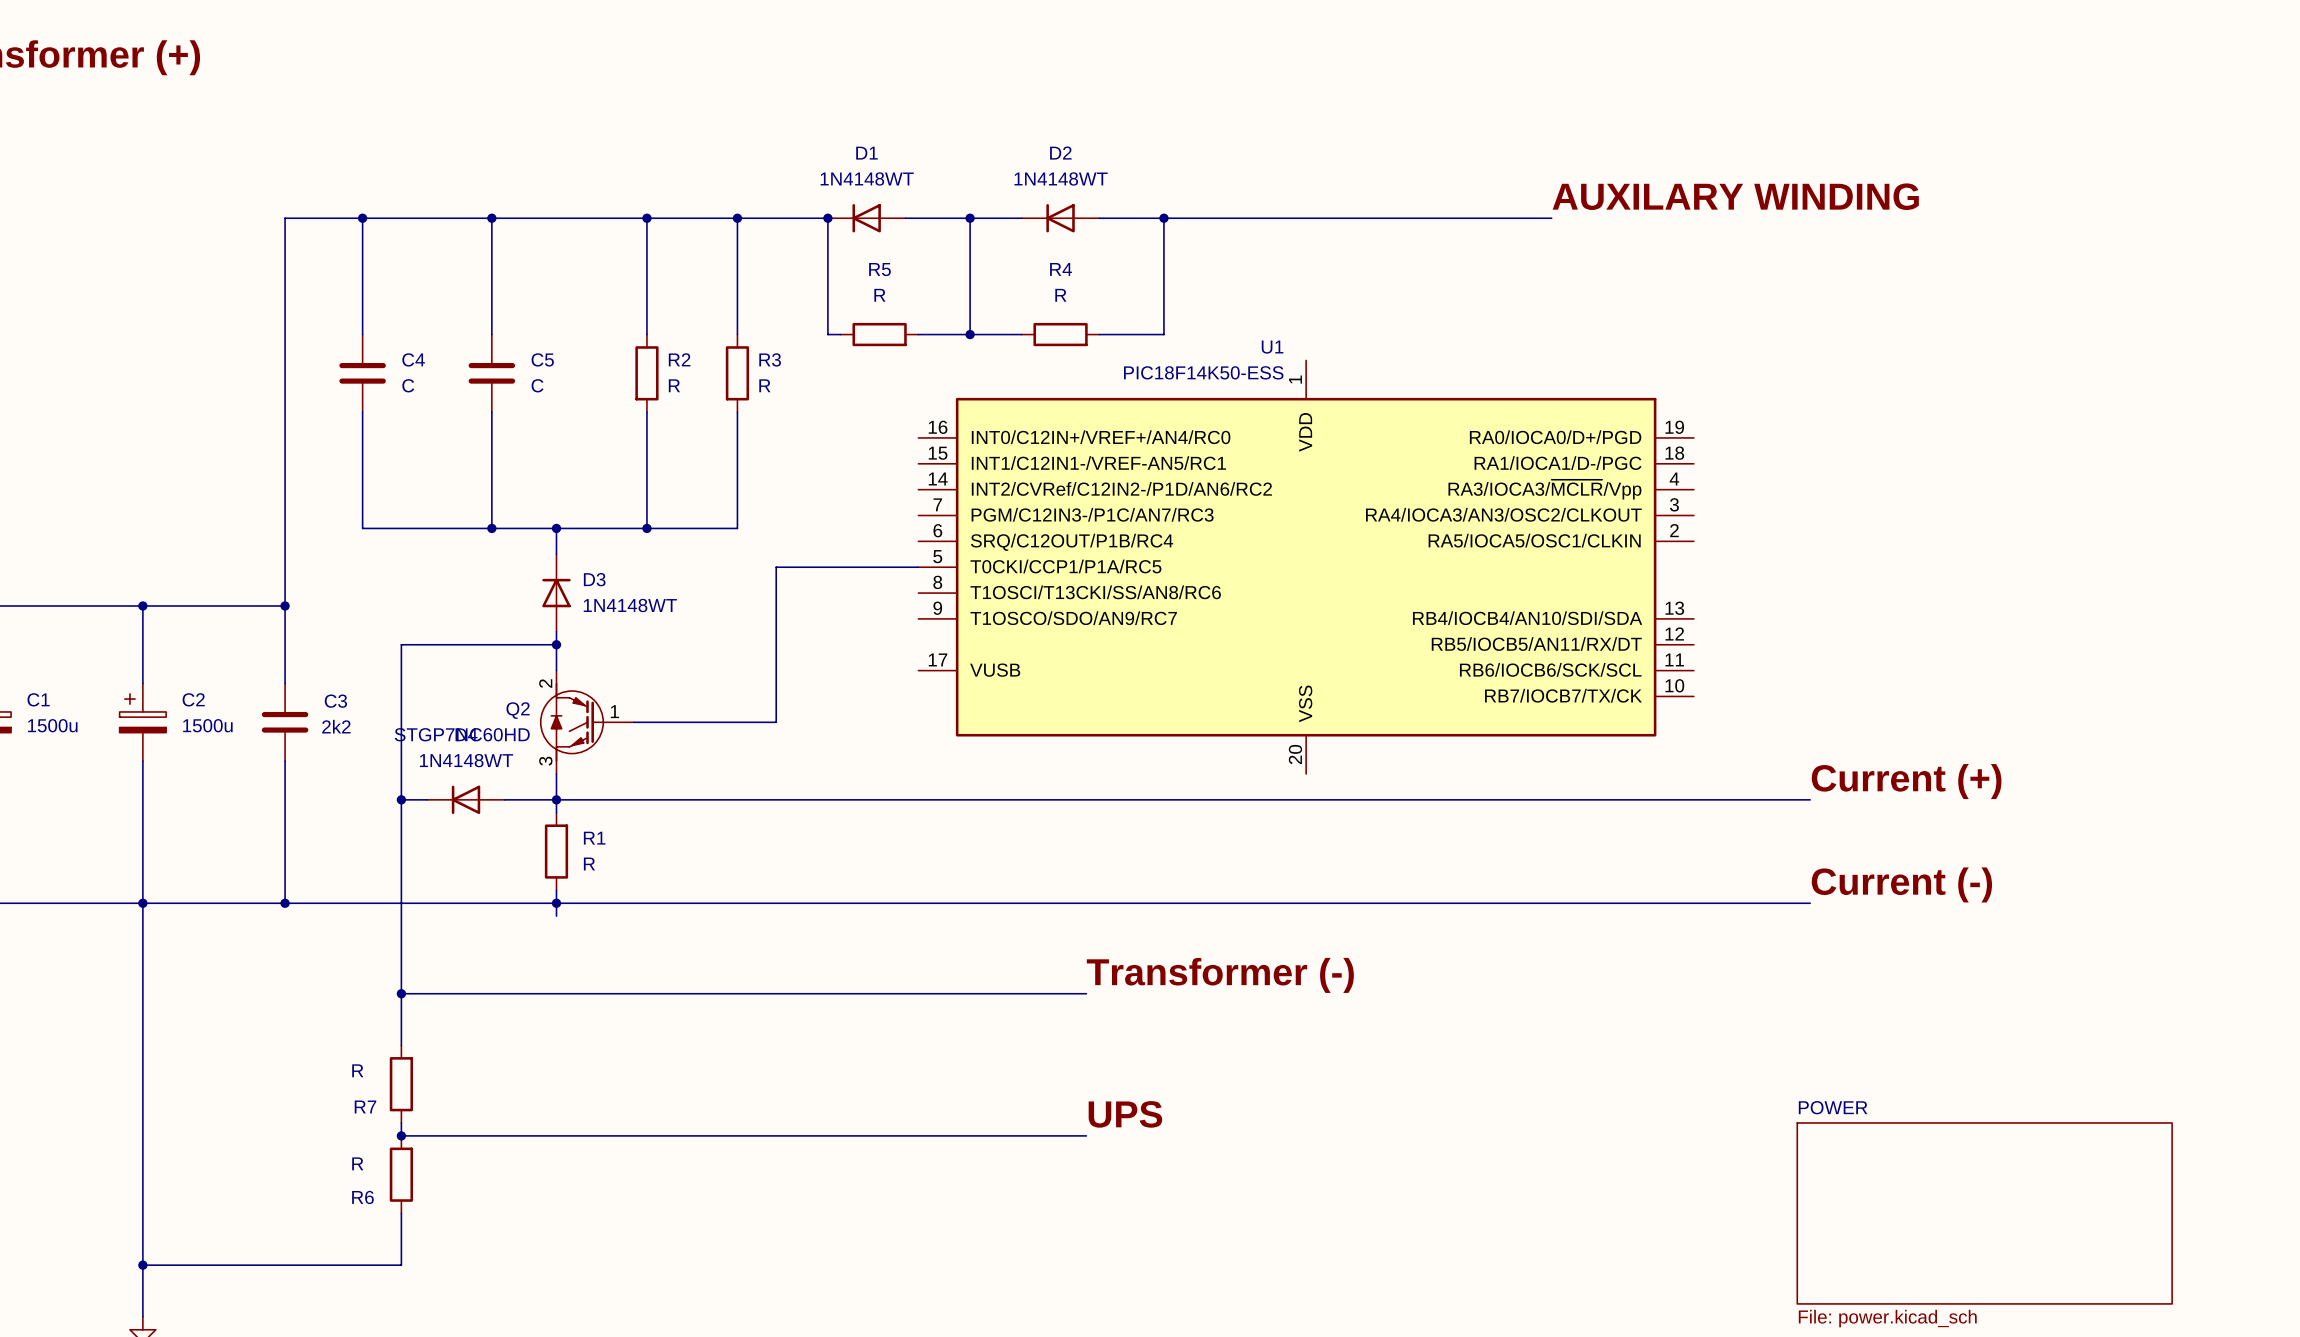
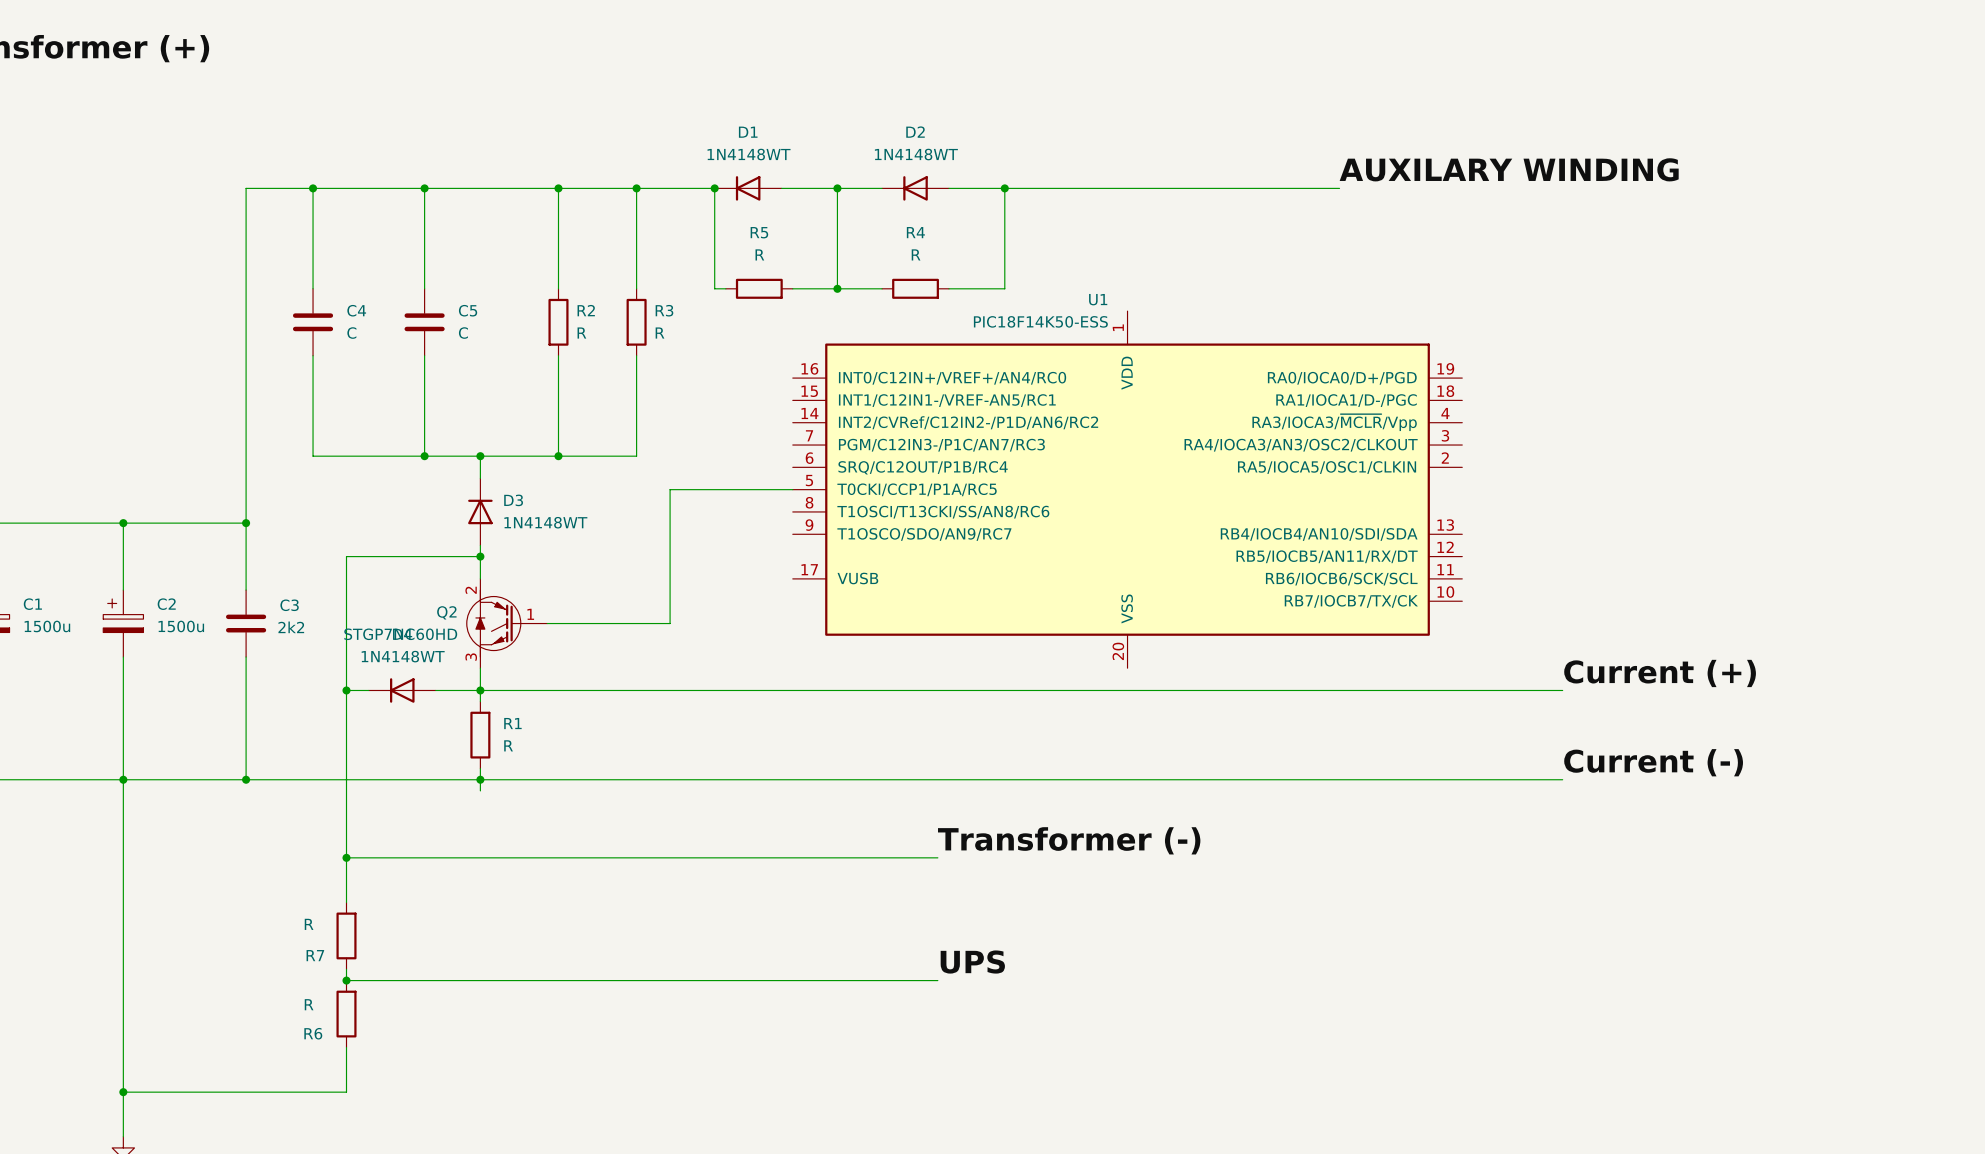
sheet POWER: File: power.kicad_sch (1984, 1213) -> none

